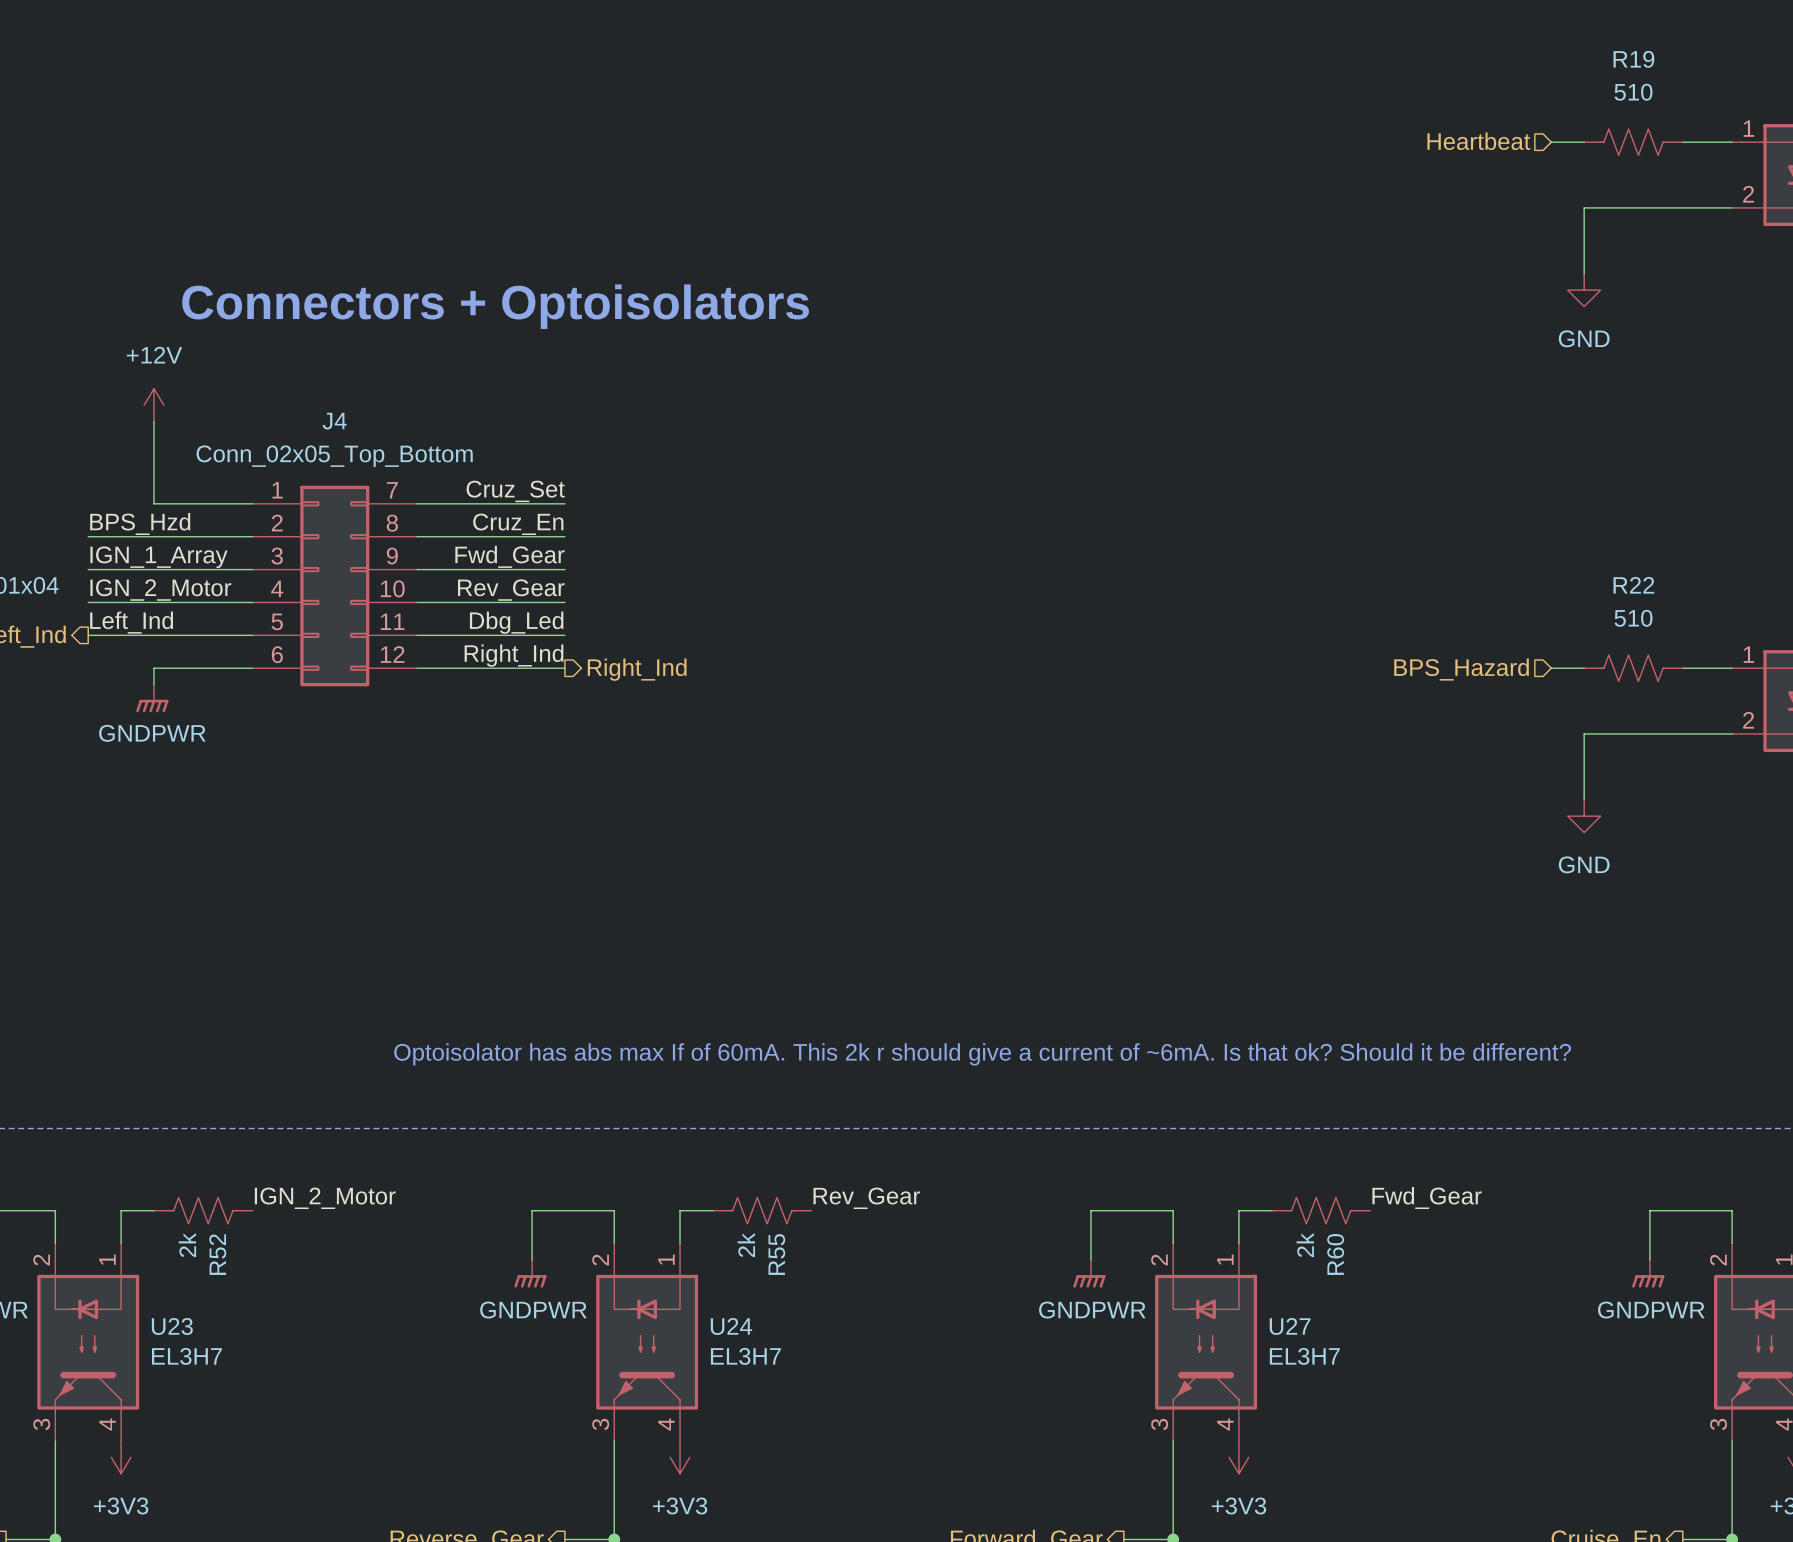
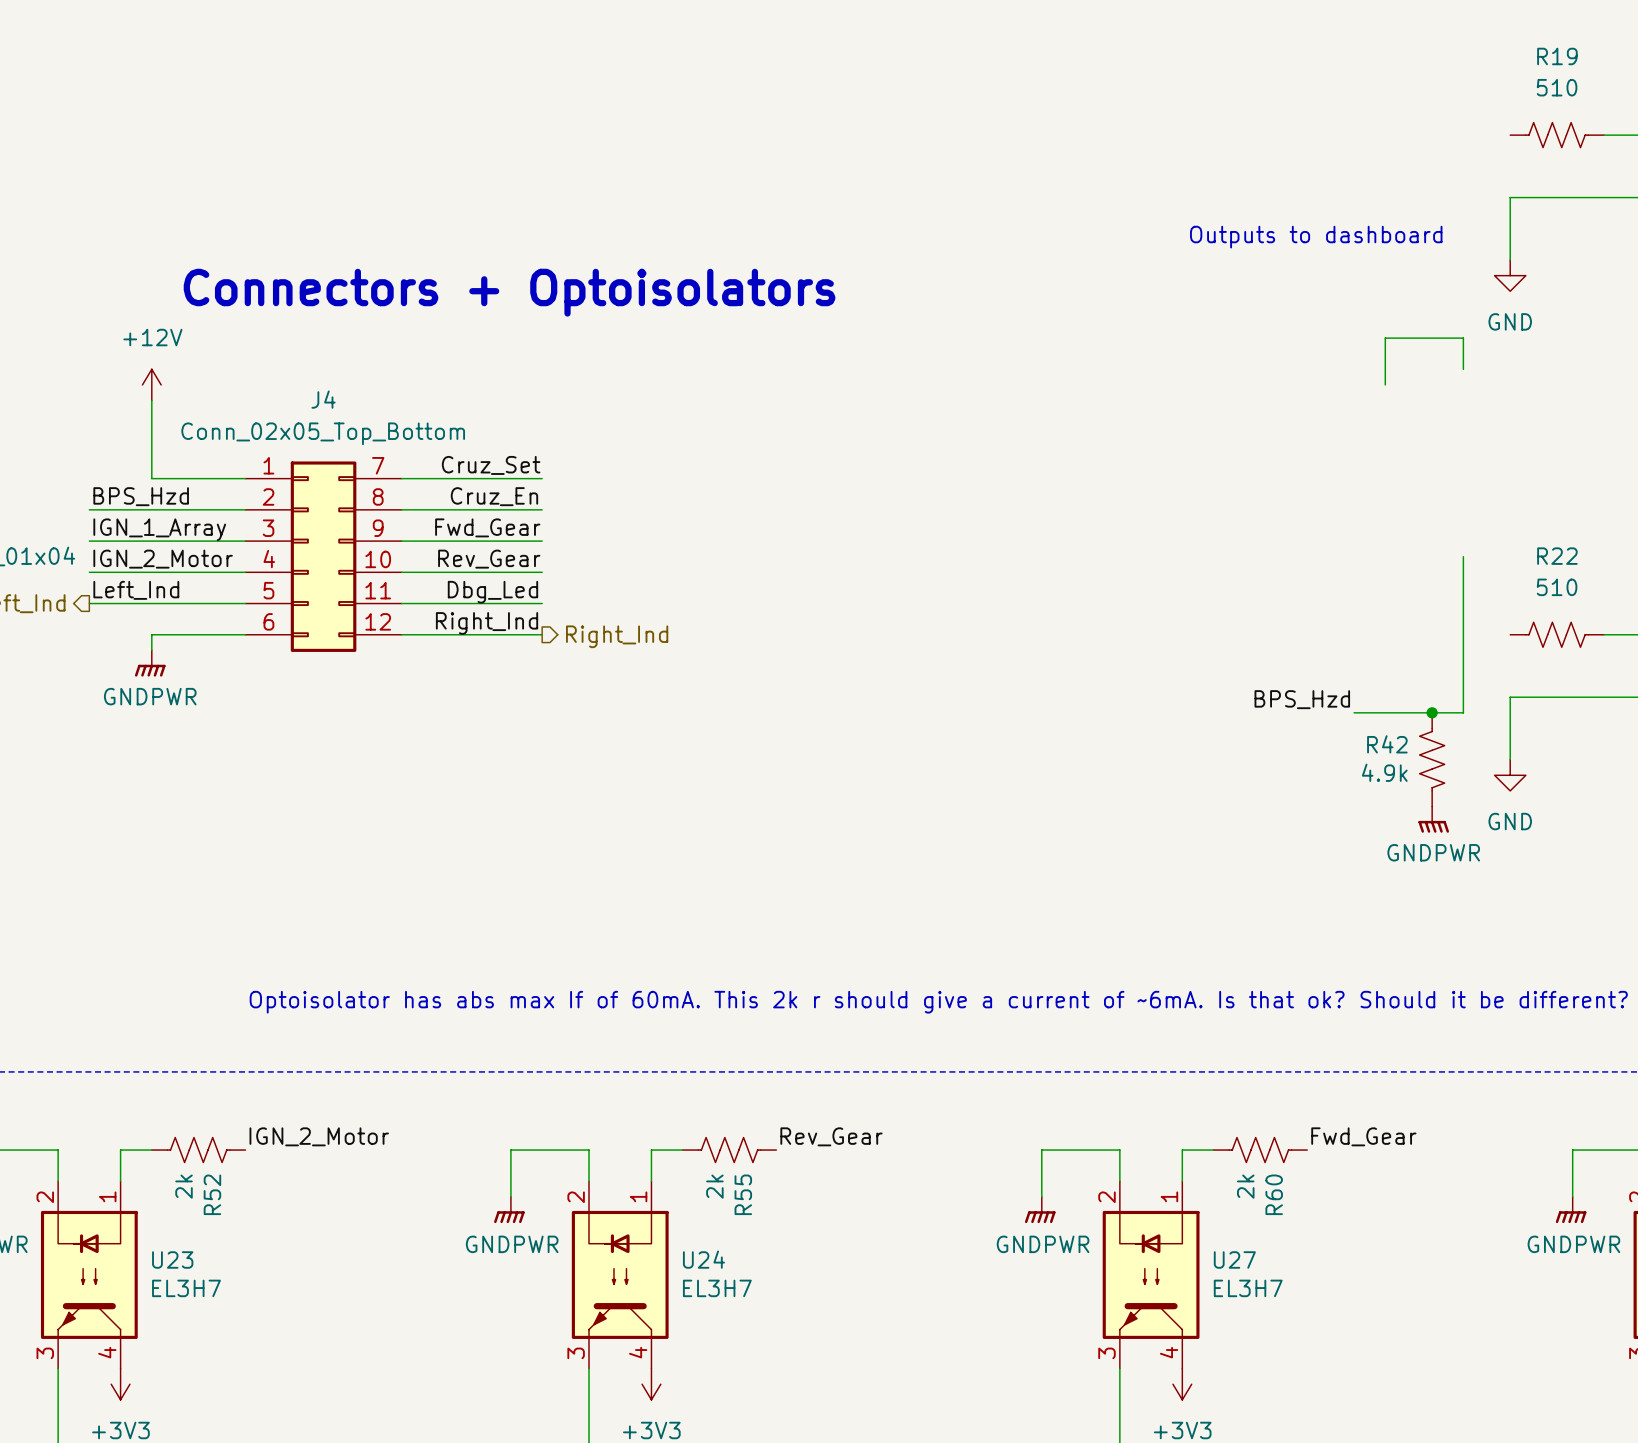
hierarchical label: Heartbeat (1478, 141) -> none
wire: (1551, 142) (1584, 142) -> none
text: none -> Outputs to dashboard (1316, 237)
wire: none -> (1463, 369) (1463, 338) (1385, 338) (1385, 384)
wire: none -> (1463, 556) (1463, 712) (1354, 712)
wire: (1551, 668) (1584, 668) -> none
hierarchical label: BPS_Hazard (1461, 669) -> none
label: none -> BPS_Hzd (1302, 699)
junction: none -> (1432, 712)
R42: none -> 4.9k (1432, 759)
power symbol: none -> GNDPWR (1433, 819)

